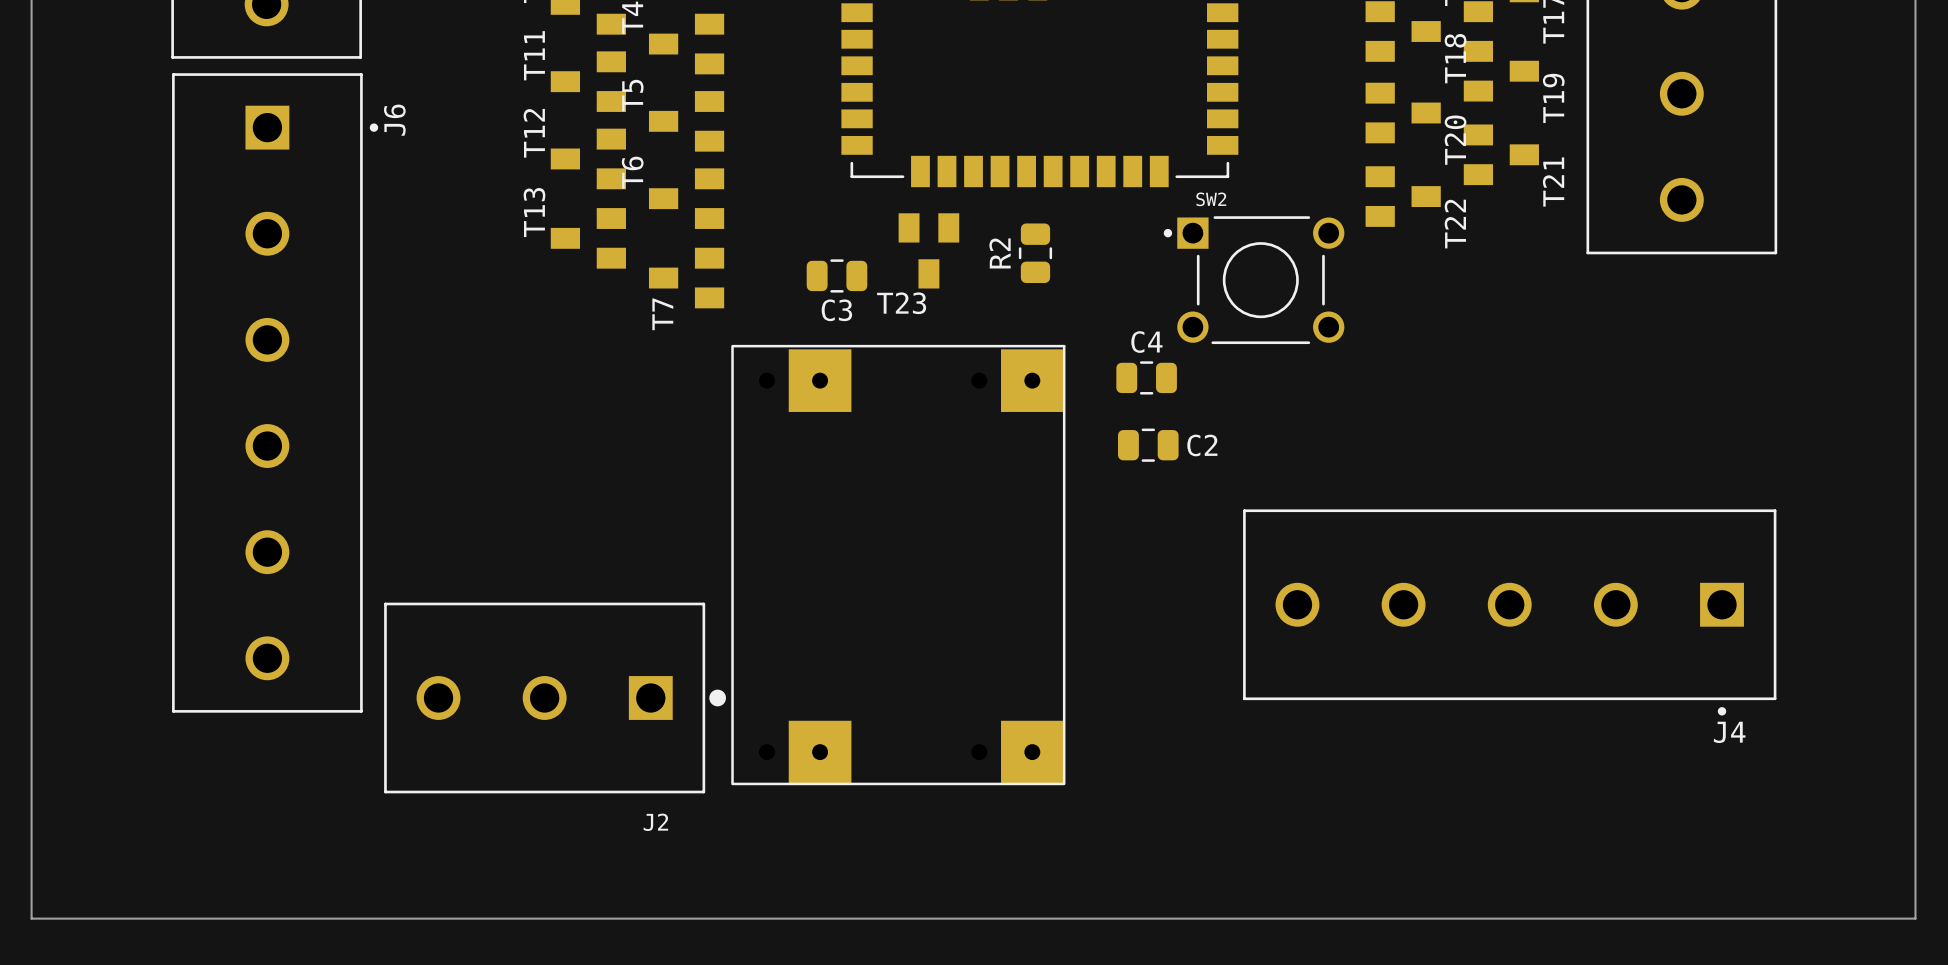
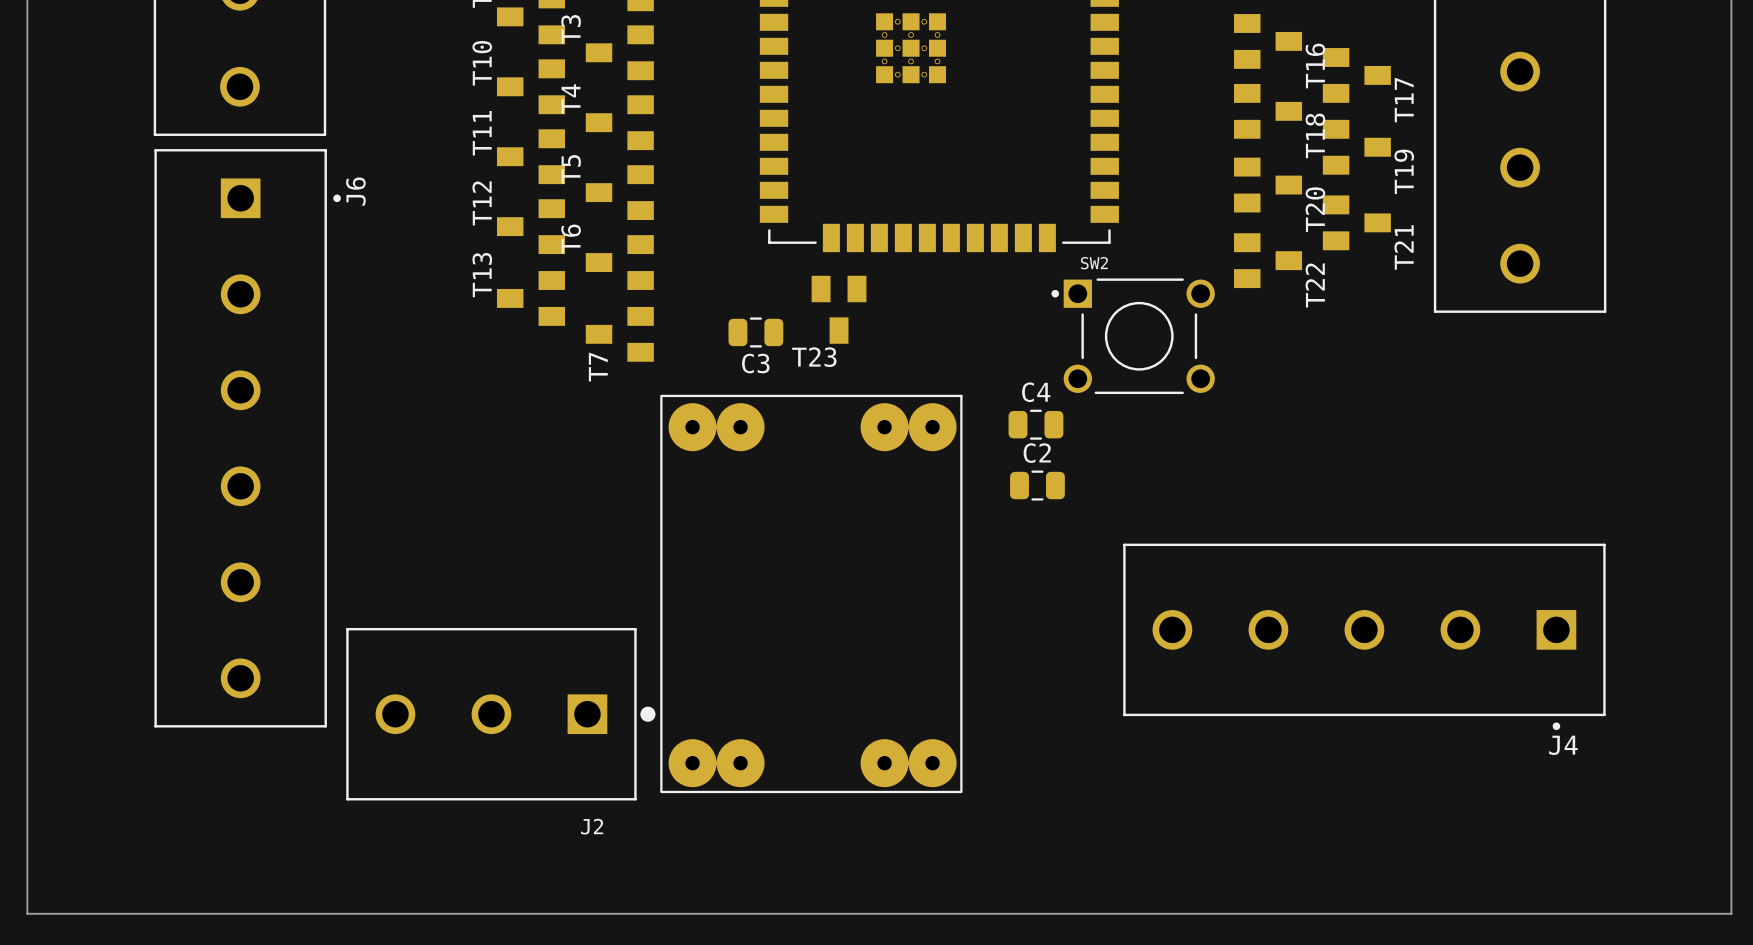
R2: (1035, 253) -> none
part footprint: [731, 344, 1066, 786] -> [660, 394, 963, 794]
C2 name position: C2 (1202, 445) -> C2 (1037, 453)

